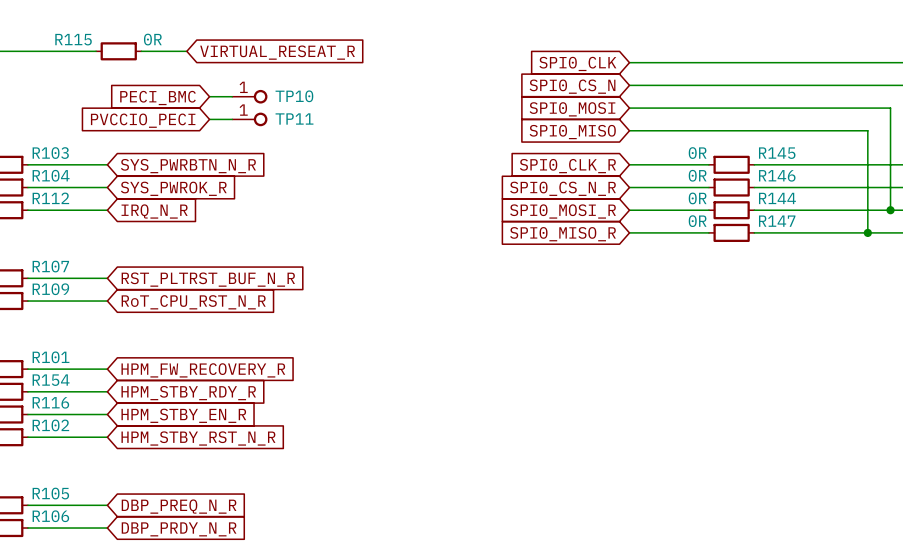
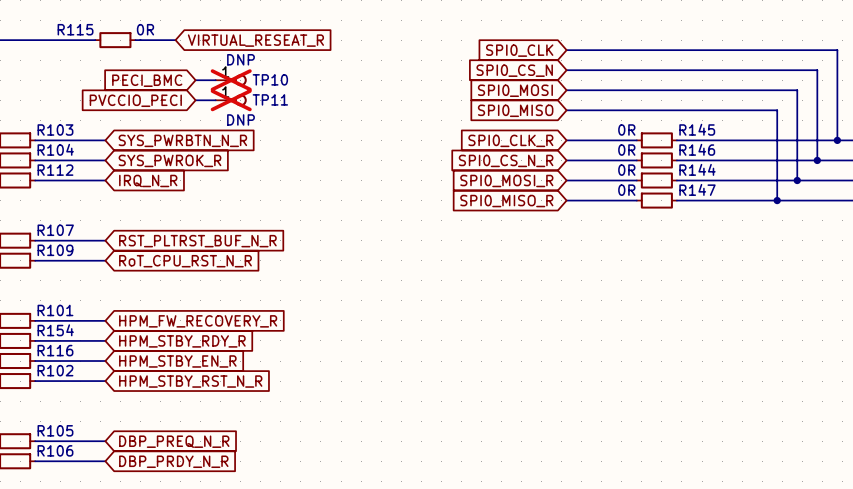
TP10 text: none -> DNP (240, 59)
TP10 do-not-place cross: none -> (231, 80)
TP11 do-not-place cross: none -> (231, 100)
TP11 text: none -> DNP (240, 119)

